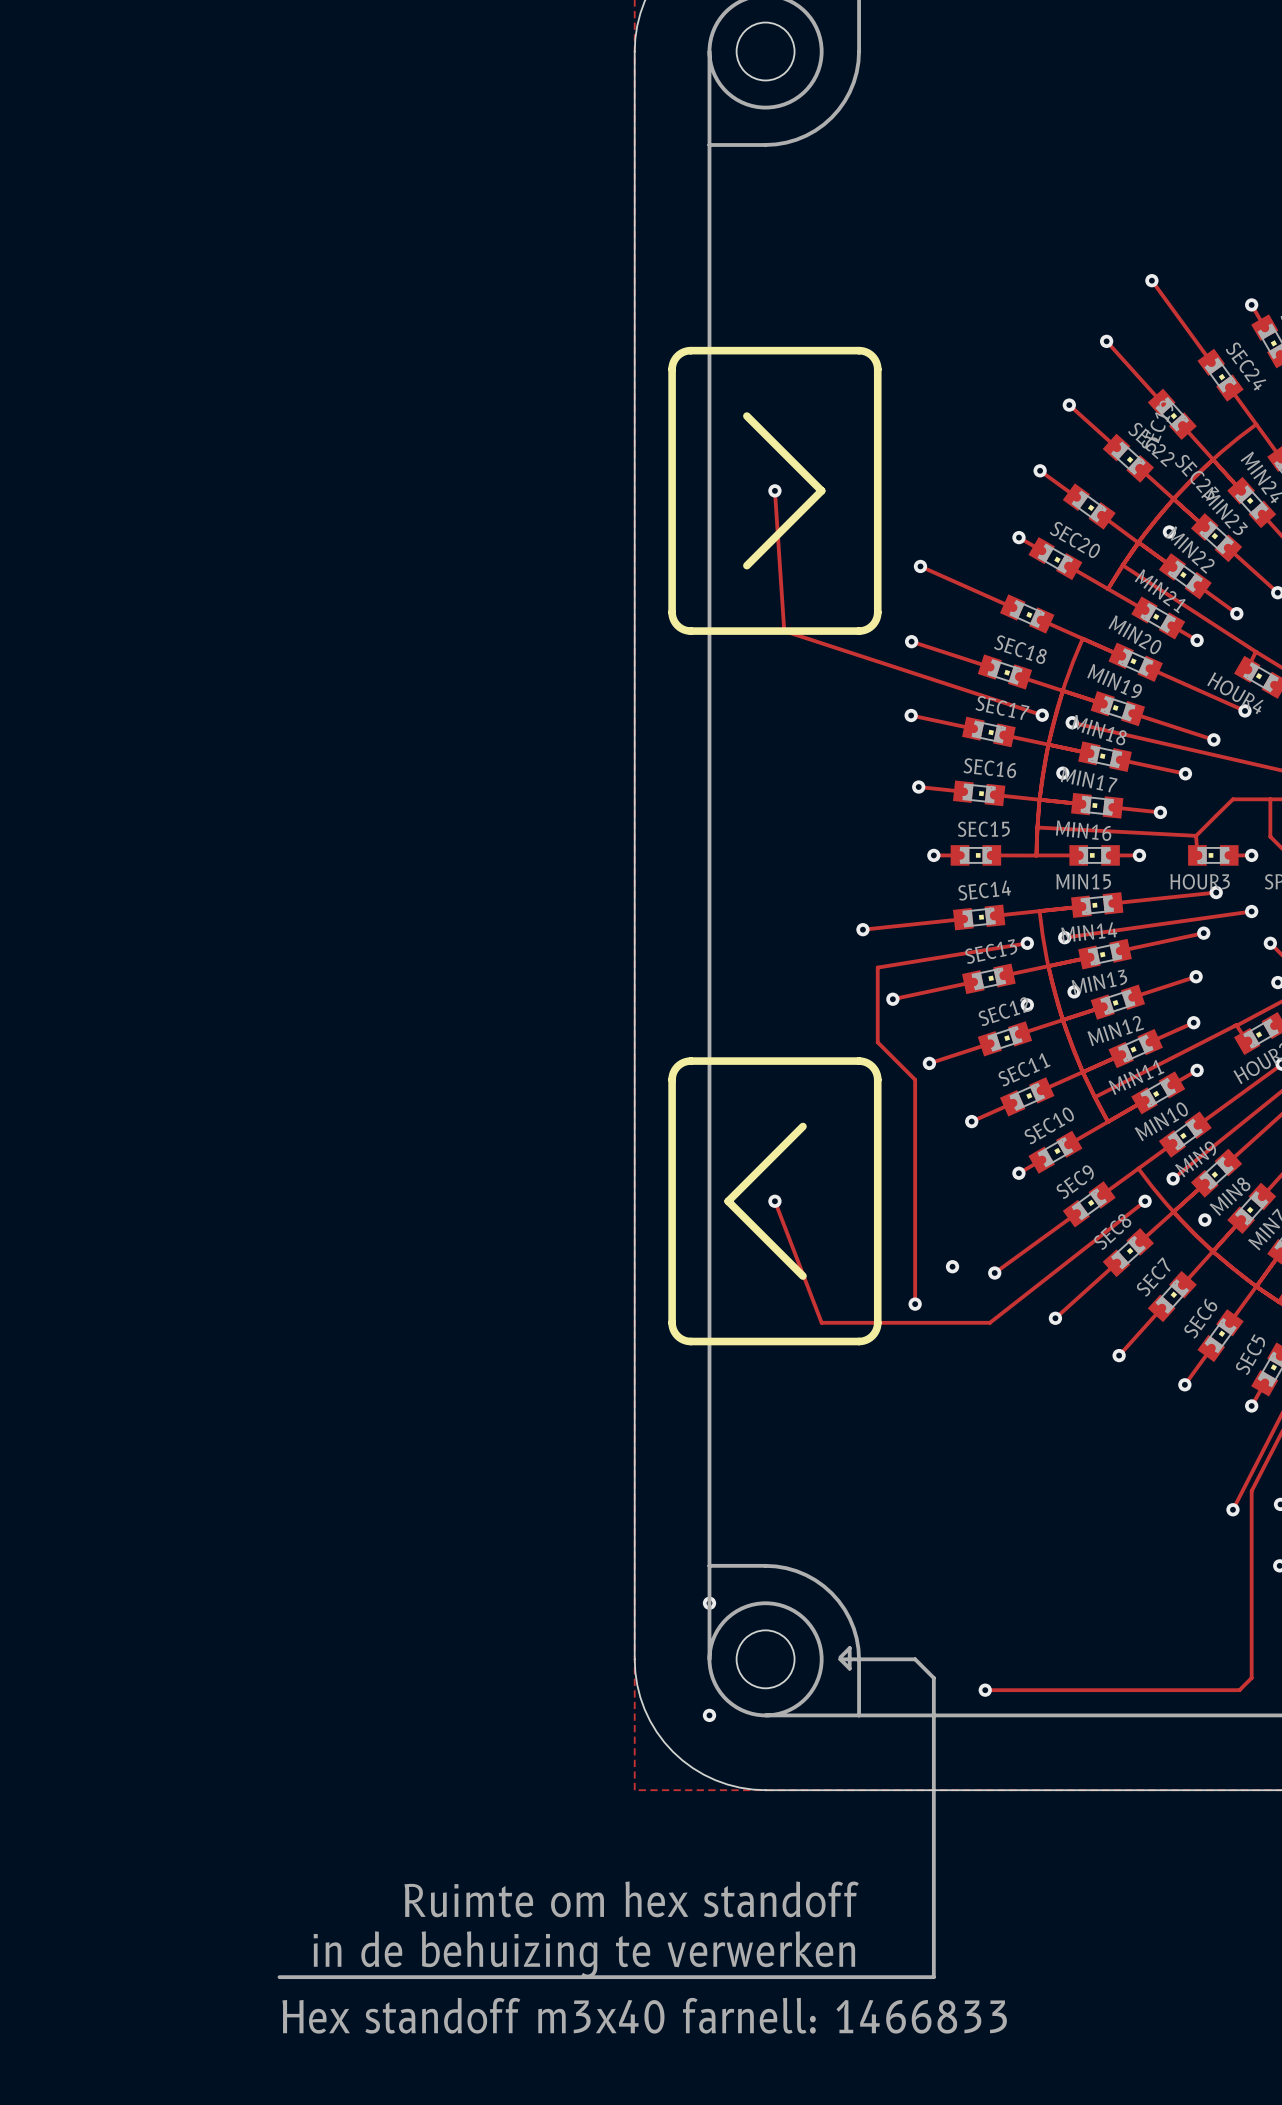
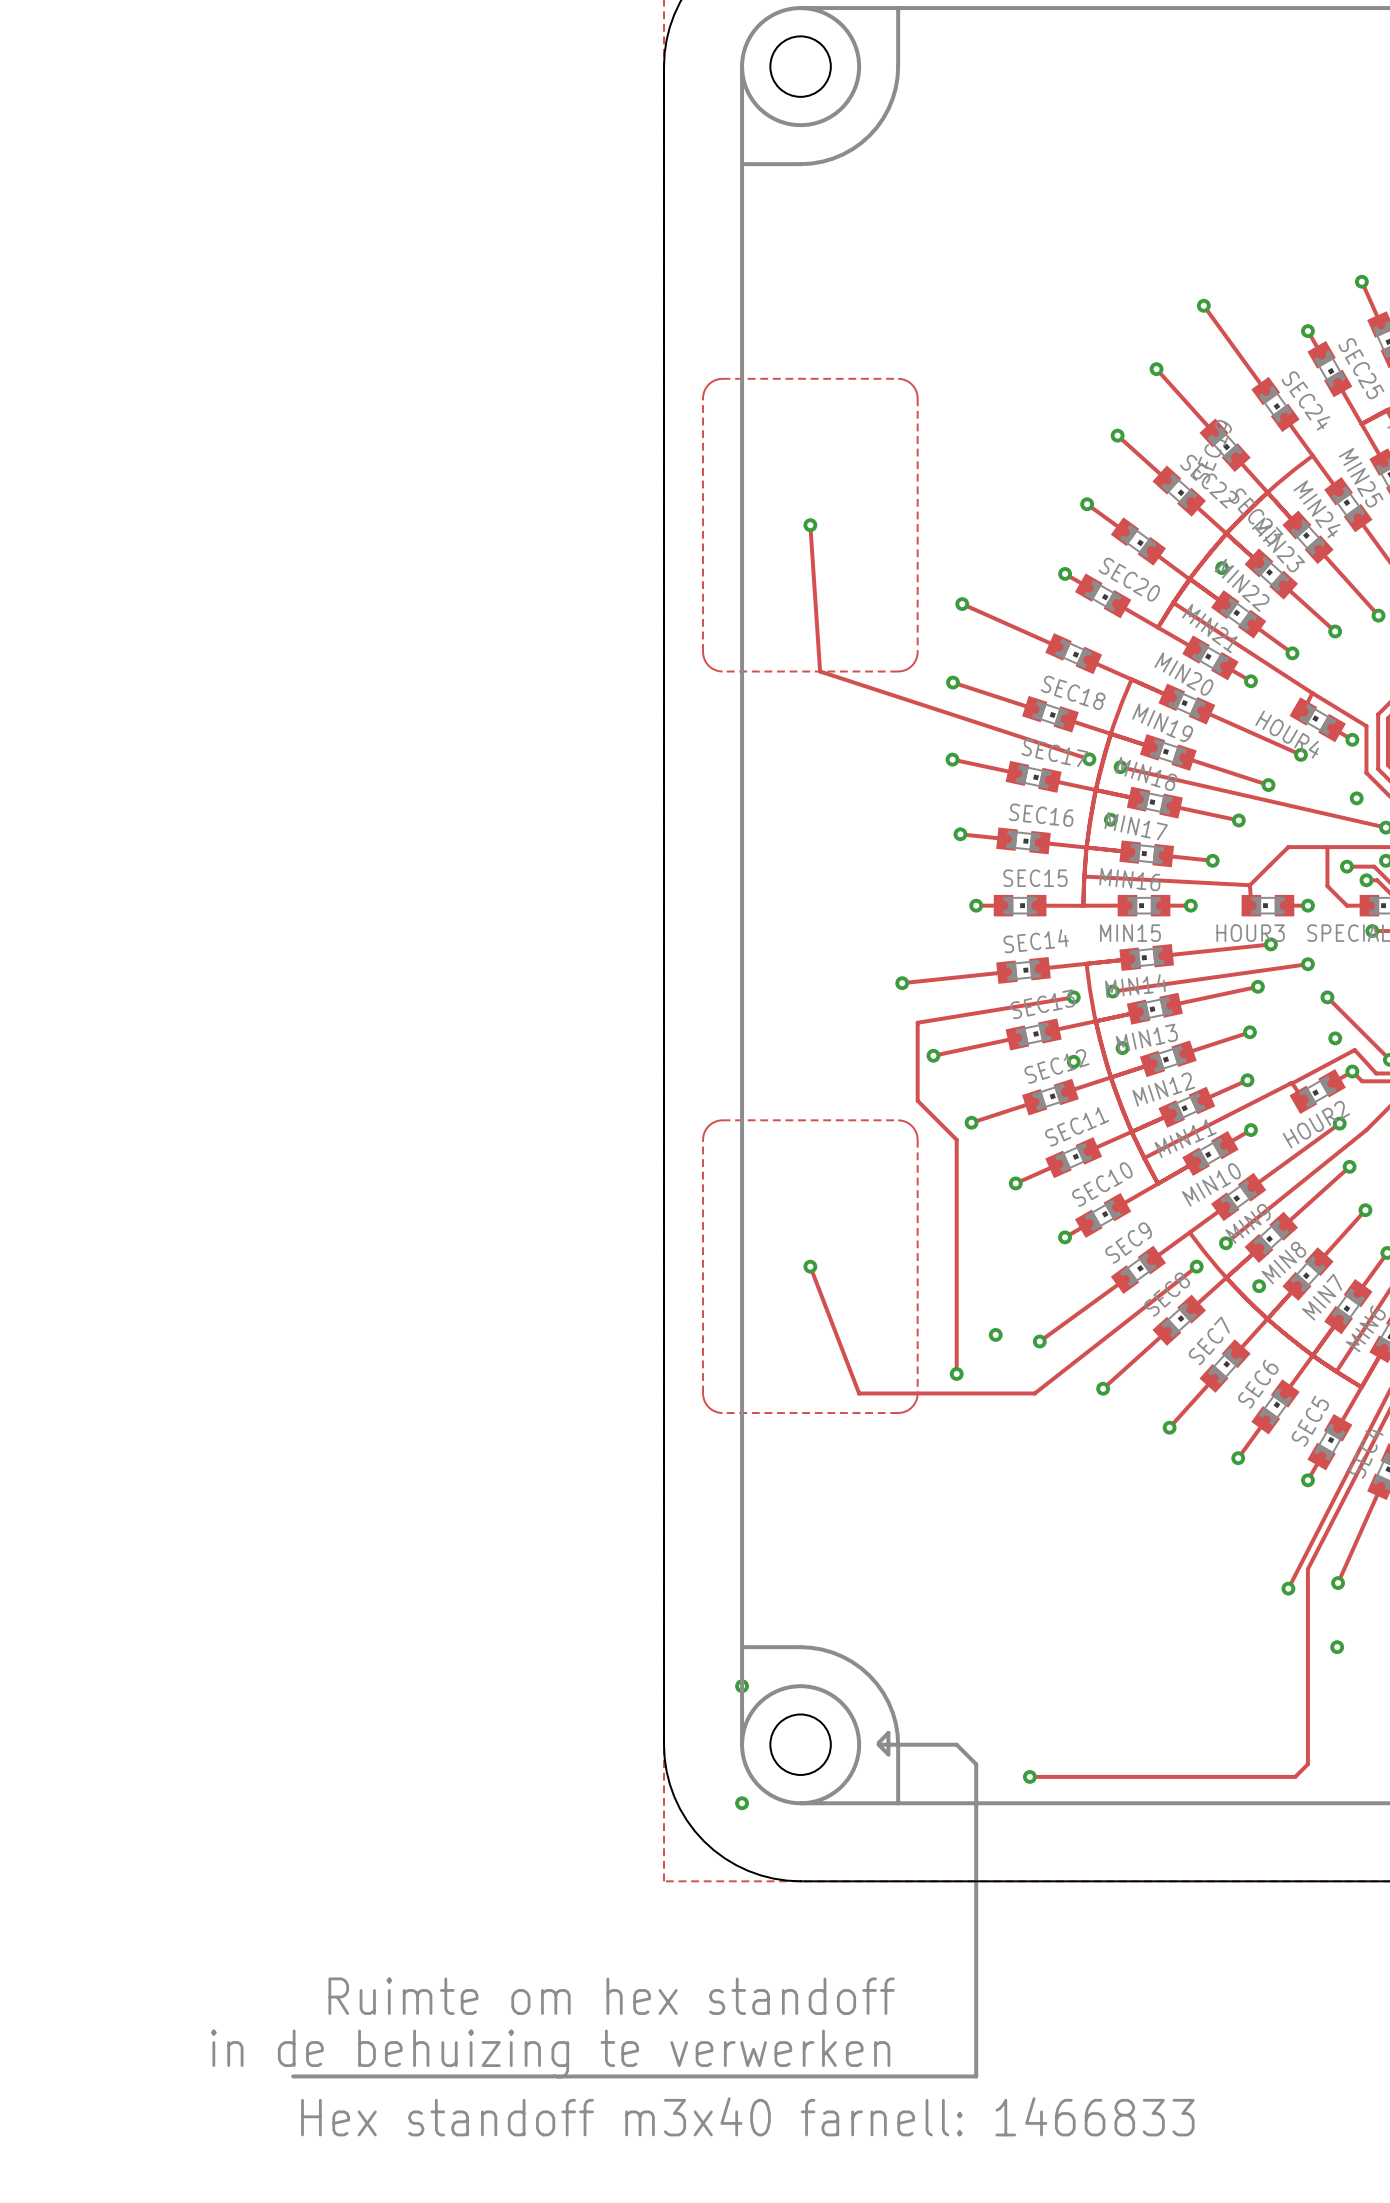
line: (690, 350) (859, 350) (868, 353) (875, 359) (877, 369) (877, 612) (875, 621) (868, 628) (859, 631) (690, 631) (681, 628) (674, 621) (672, 612) (672, 369) (677, 356) (690, 350) -> none
line: (746, 416) (821, 490) (746, 565) -> none
line: (690, 1061) (859, 1061) (868, 1063) (875, 1070) (877, 1079) (877, 1322) (875, 1332) (868, 1339) (859, 1341) (690, 1341) (681, 1339) (674, 1332) (672, 1322) (672, 1079) (677, 1066) (690, 1061) -> none
line: (802, 1126) (728, 1201) (802, 1276) -> none

